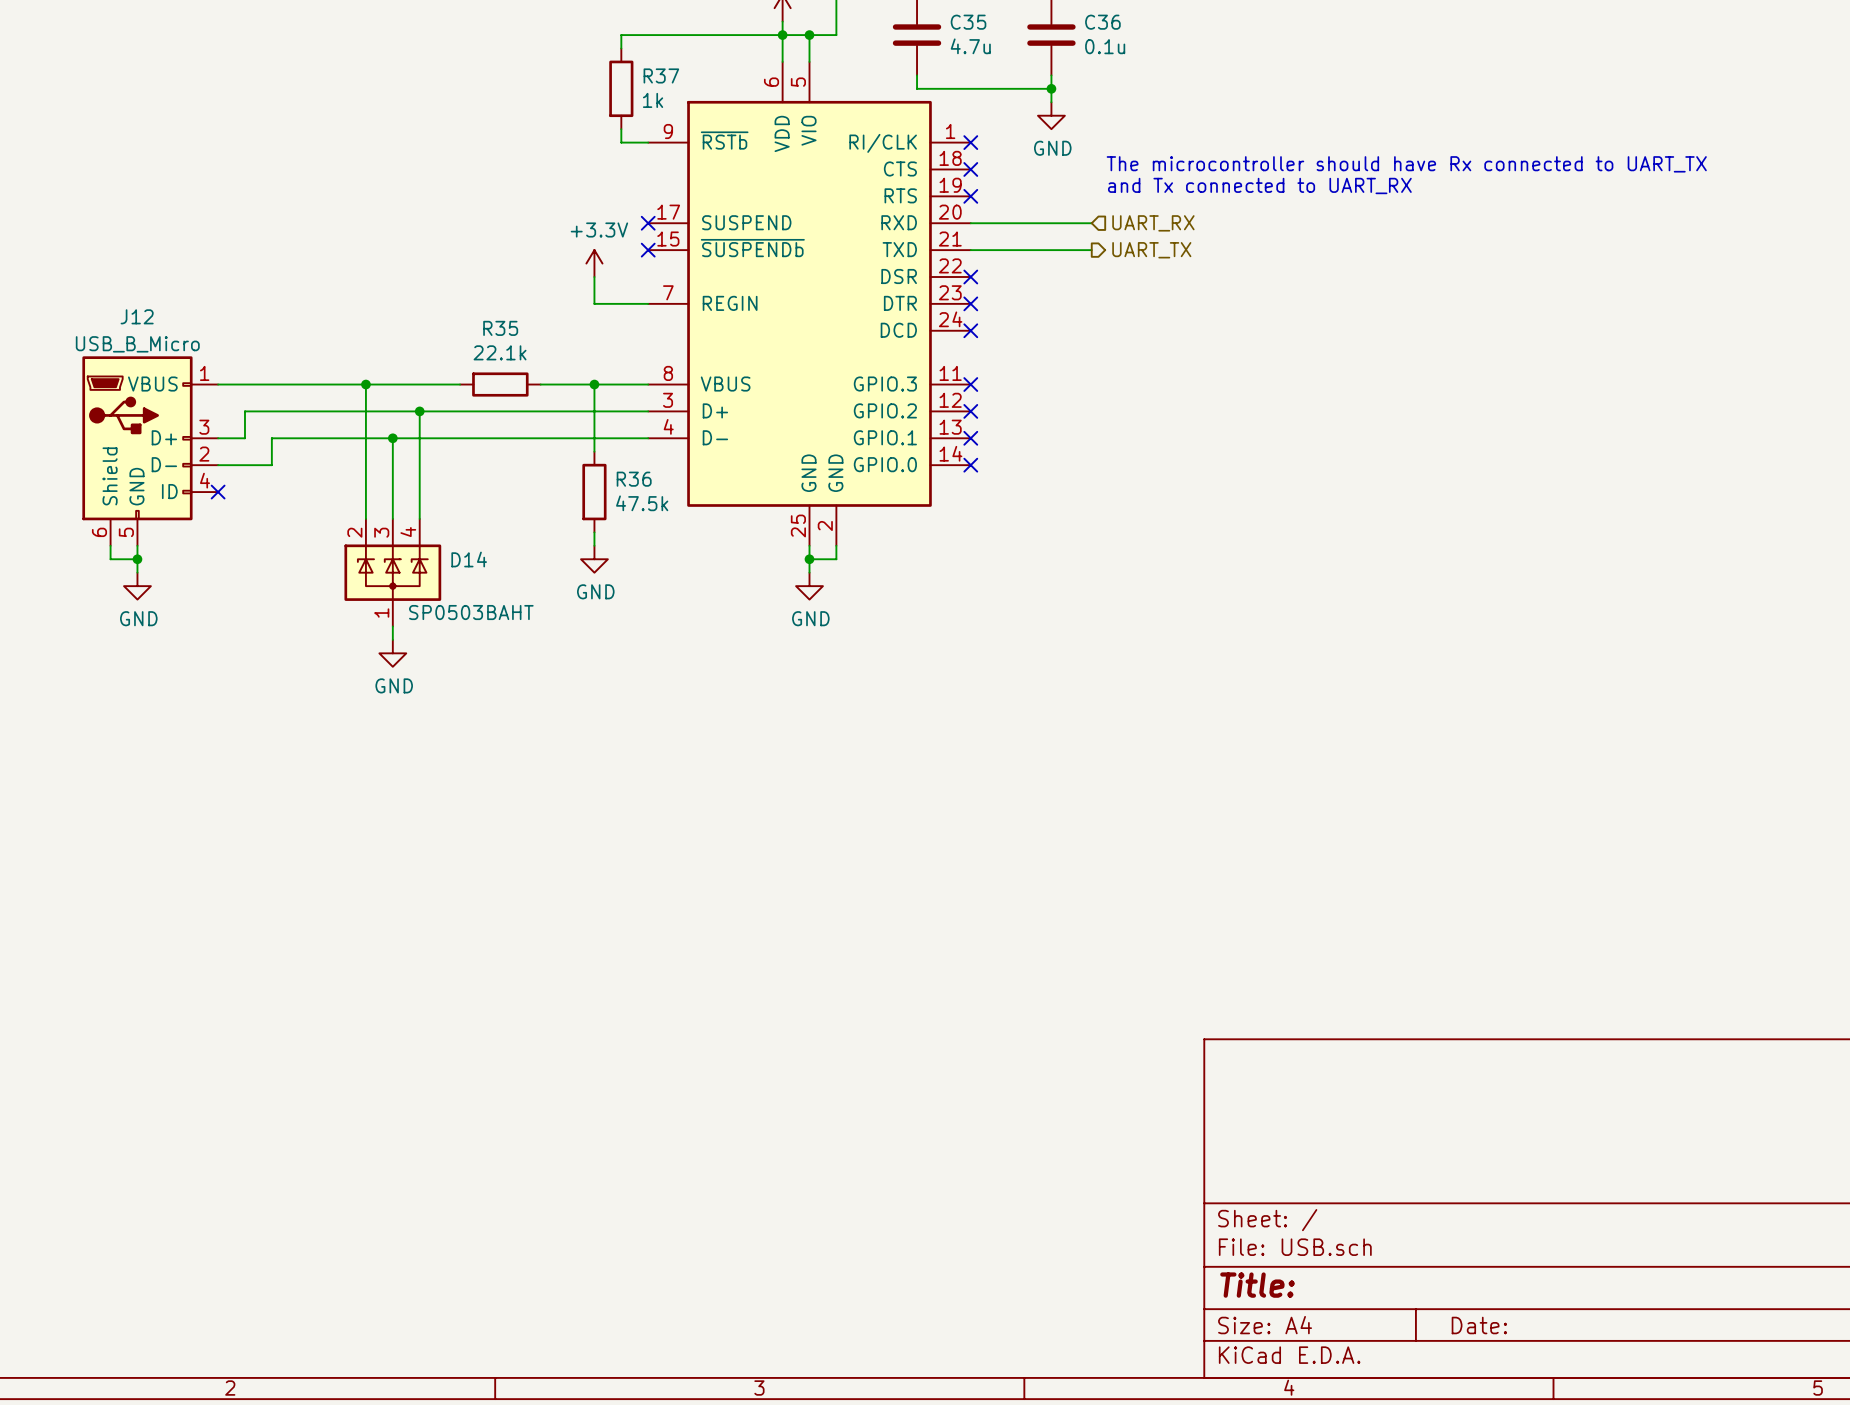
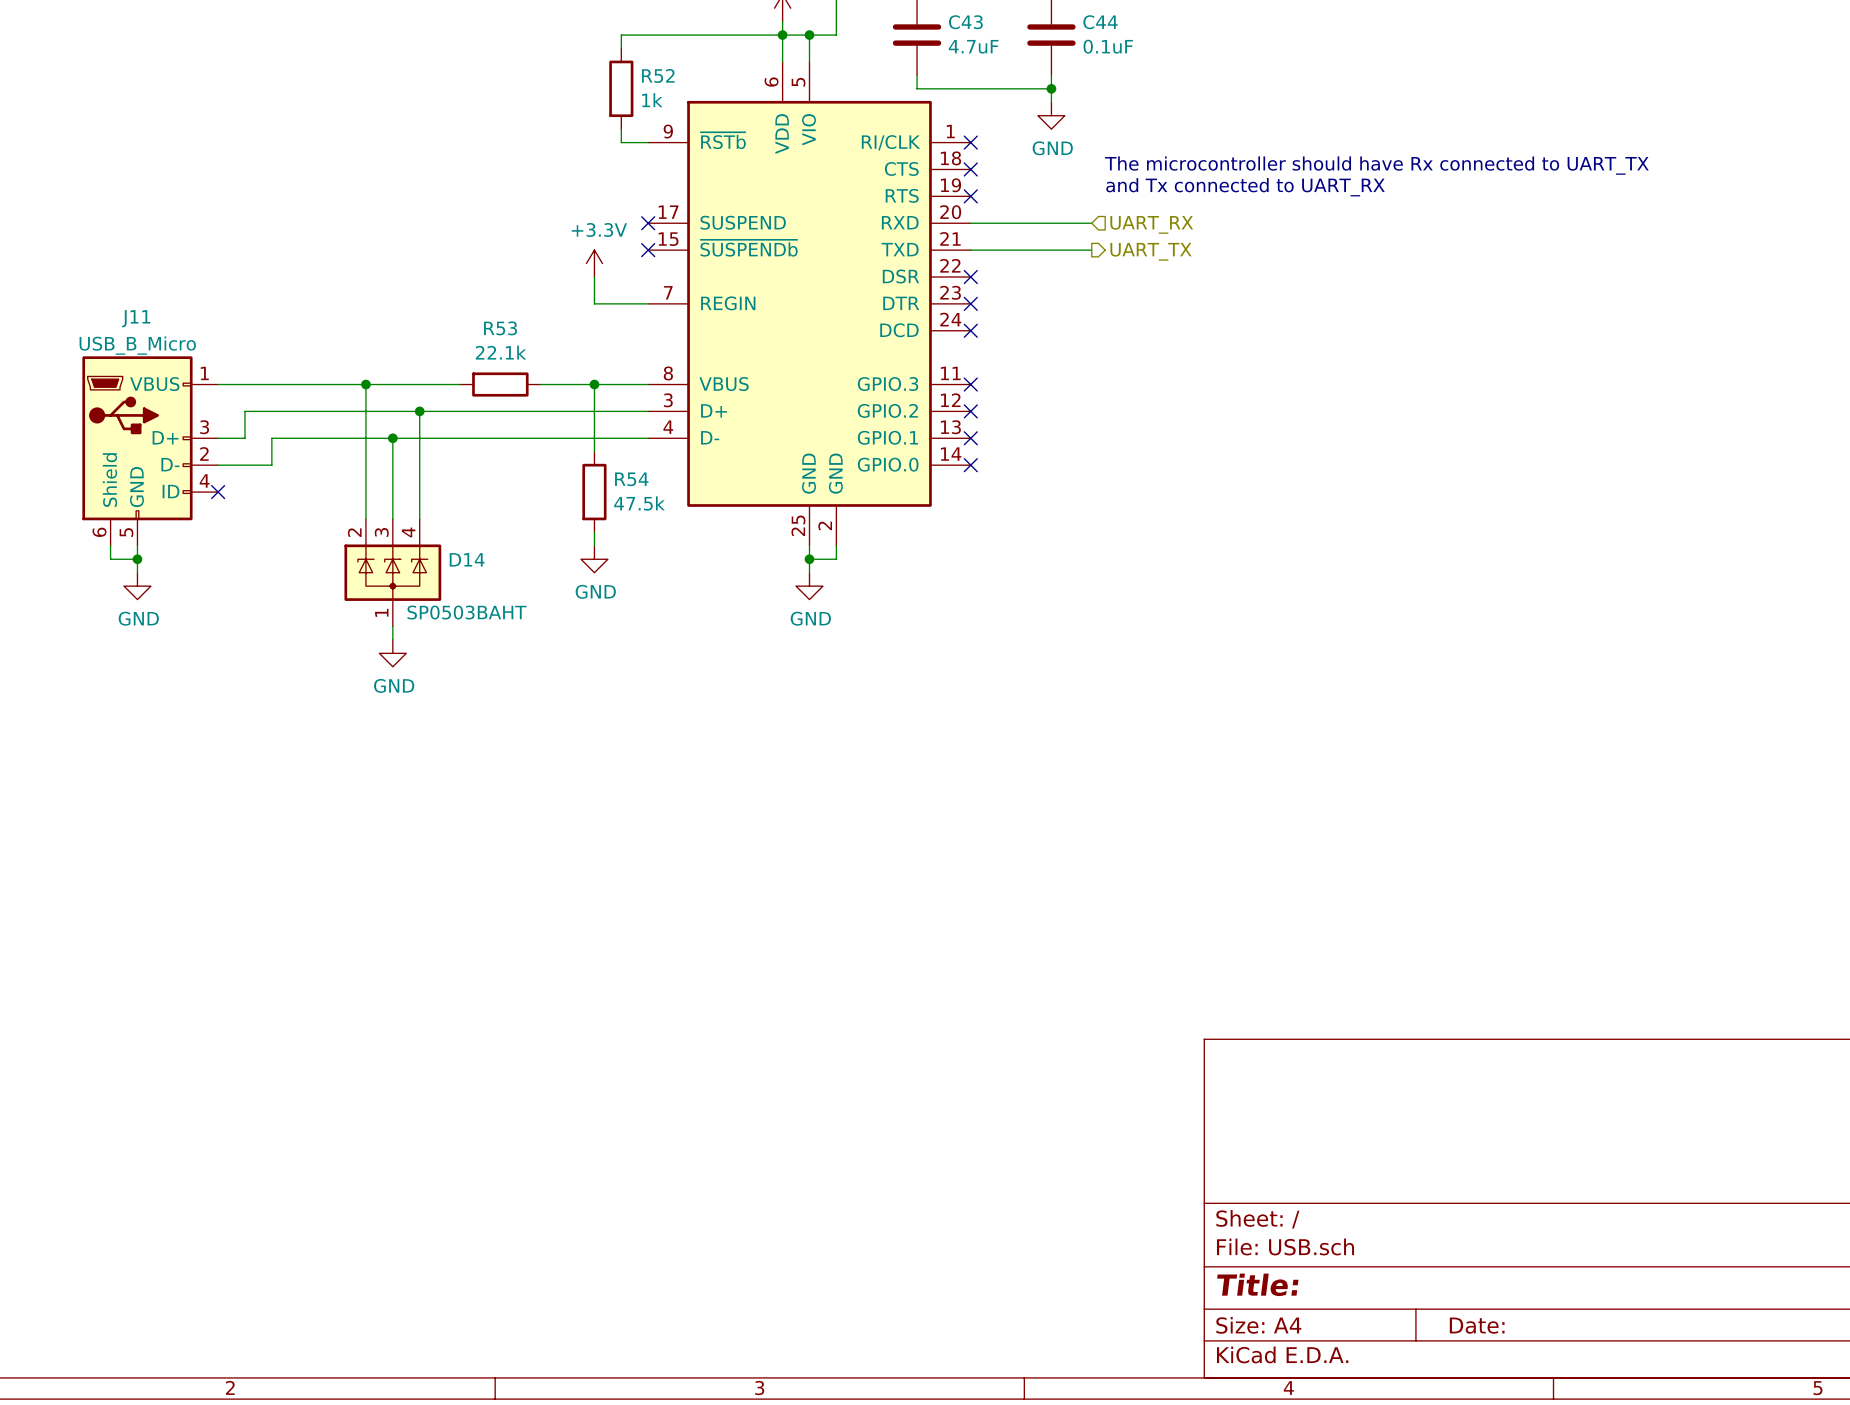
C35 name: C35 (968, 22) -> C43 (965, 22)
C36 name: C36 (1102, 22) -> C44 (1100, 22)
C35 value: 4.7u (970, 46) -> 4.7uF (973, 46)
C36 value: 0.1u (1105, 46) -> 0.1uF (1108, 46)
R37 name: R37 (661, 75) -> R52 (658, 75)
J12 name: J12 (137, 316) -> J11 (136, 318)
R35 name: R35 (500, 328) -> R53 (500, 328)
R36 name: R36 (634, 479) -> R54 (631, 479)

